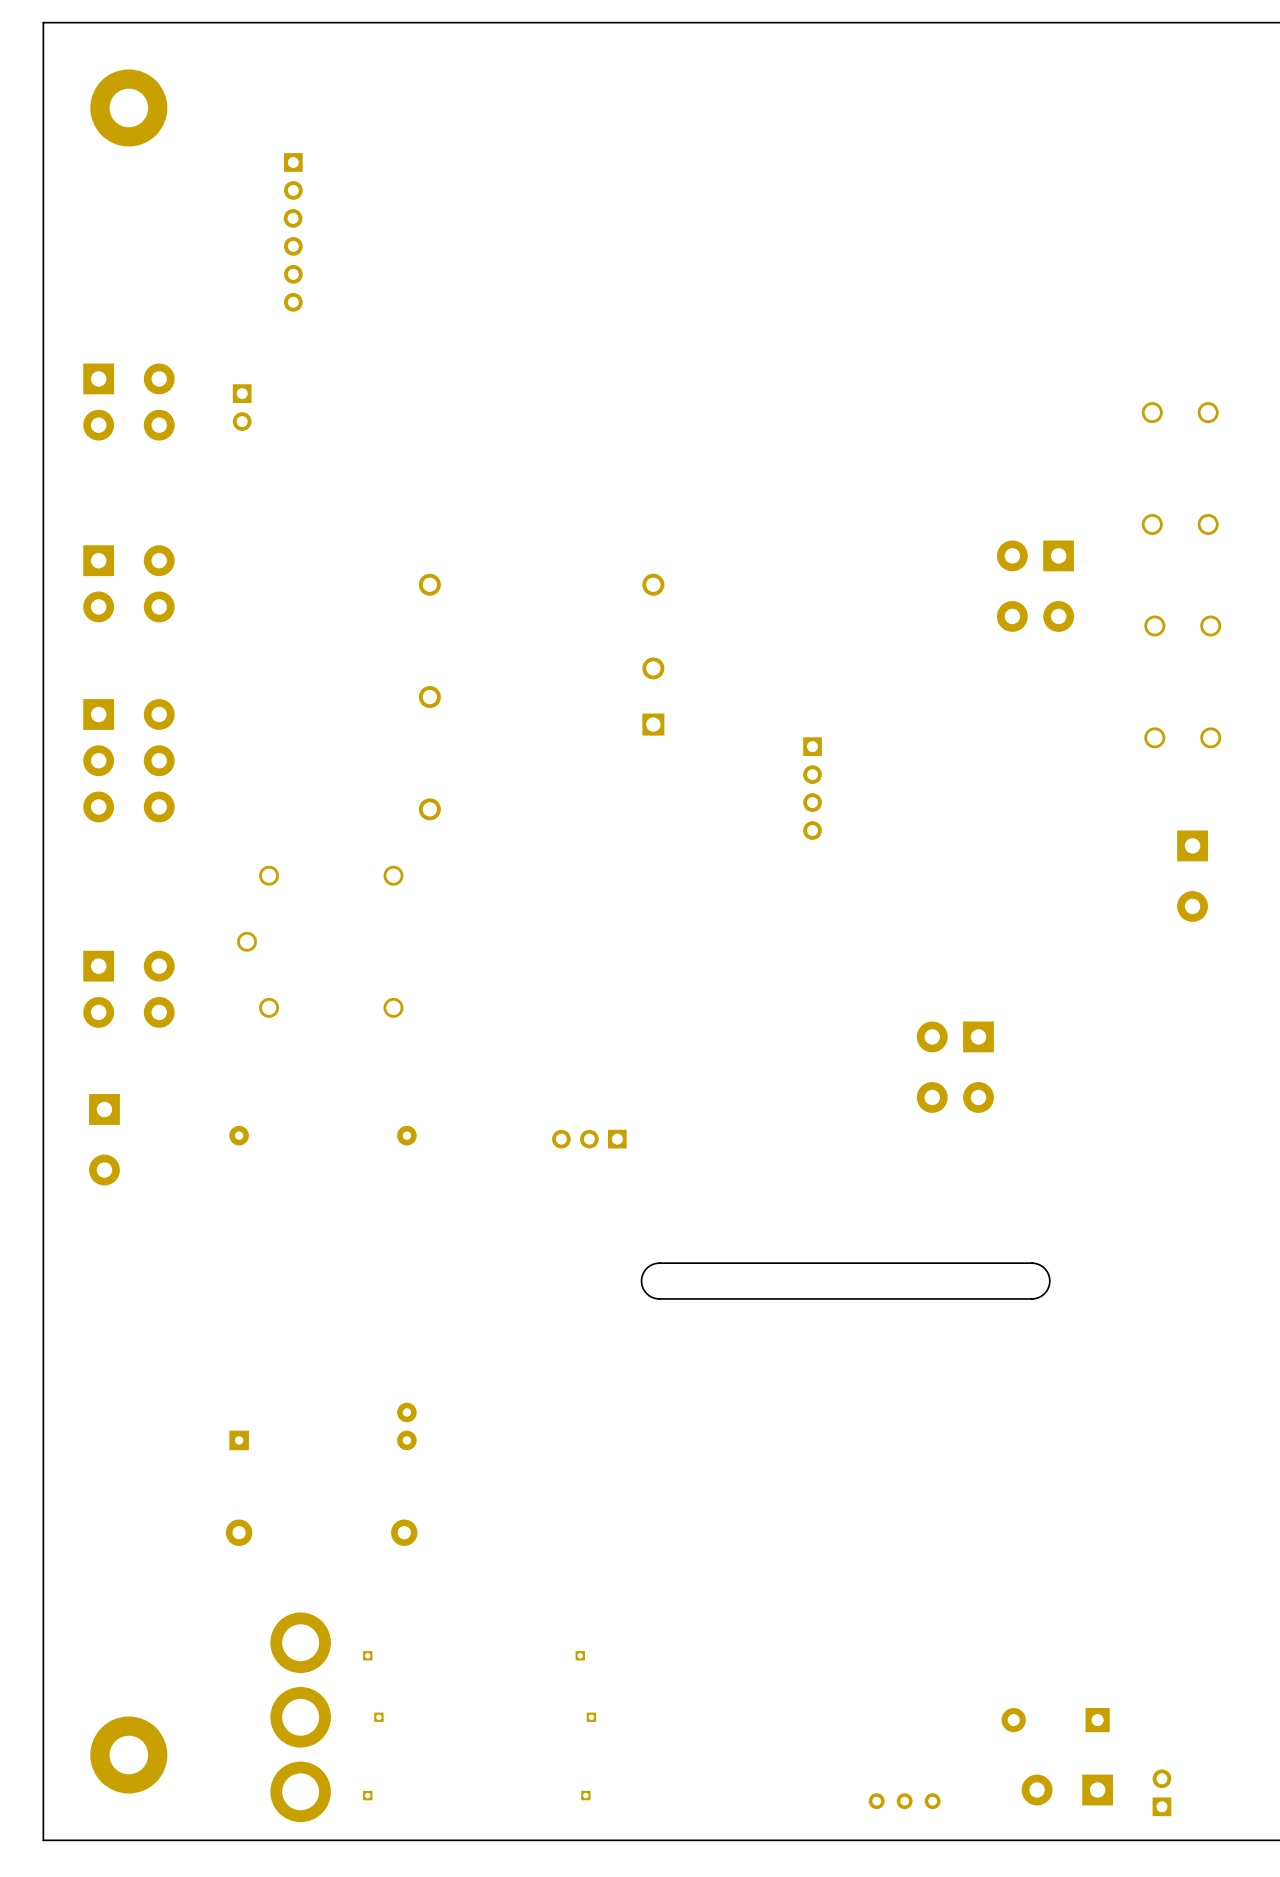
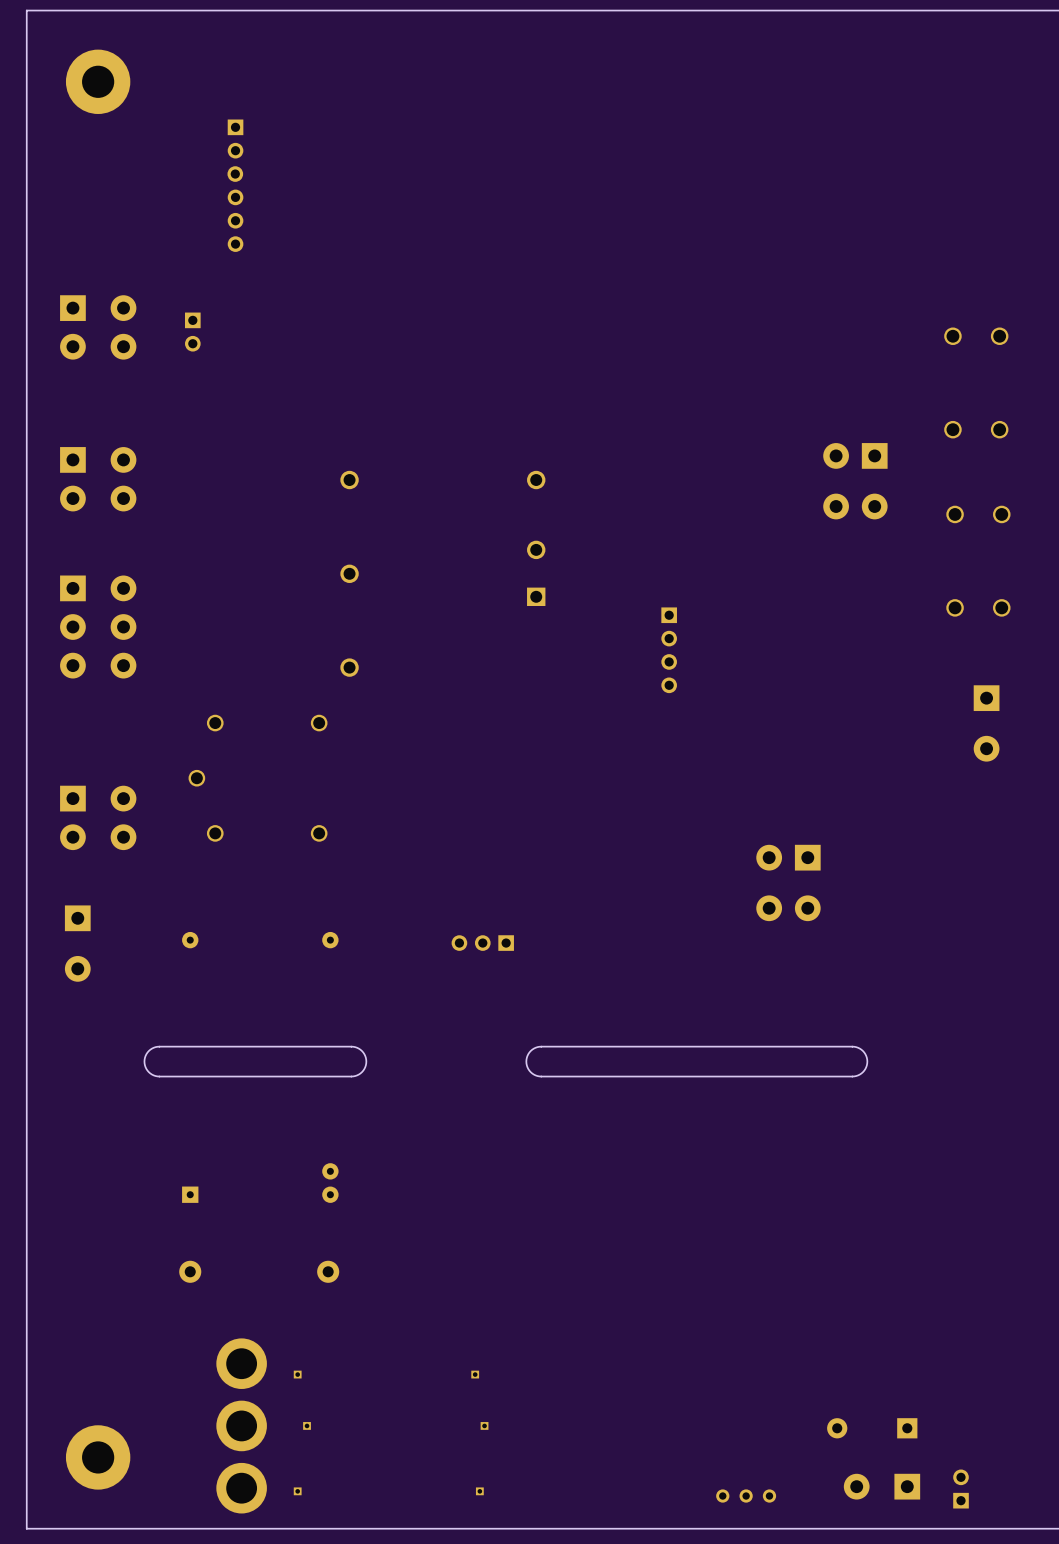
board edge: none -> (351, 1046) (157, 1046) (147, 1052) (144, 1063) (150, 1073) (159, 1076) (353, 1076) (363, 1070) (366, 1059) (360, 1049) (351, 1046)

